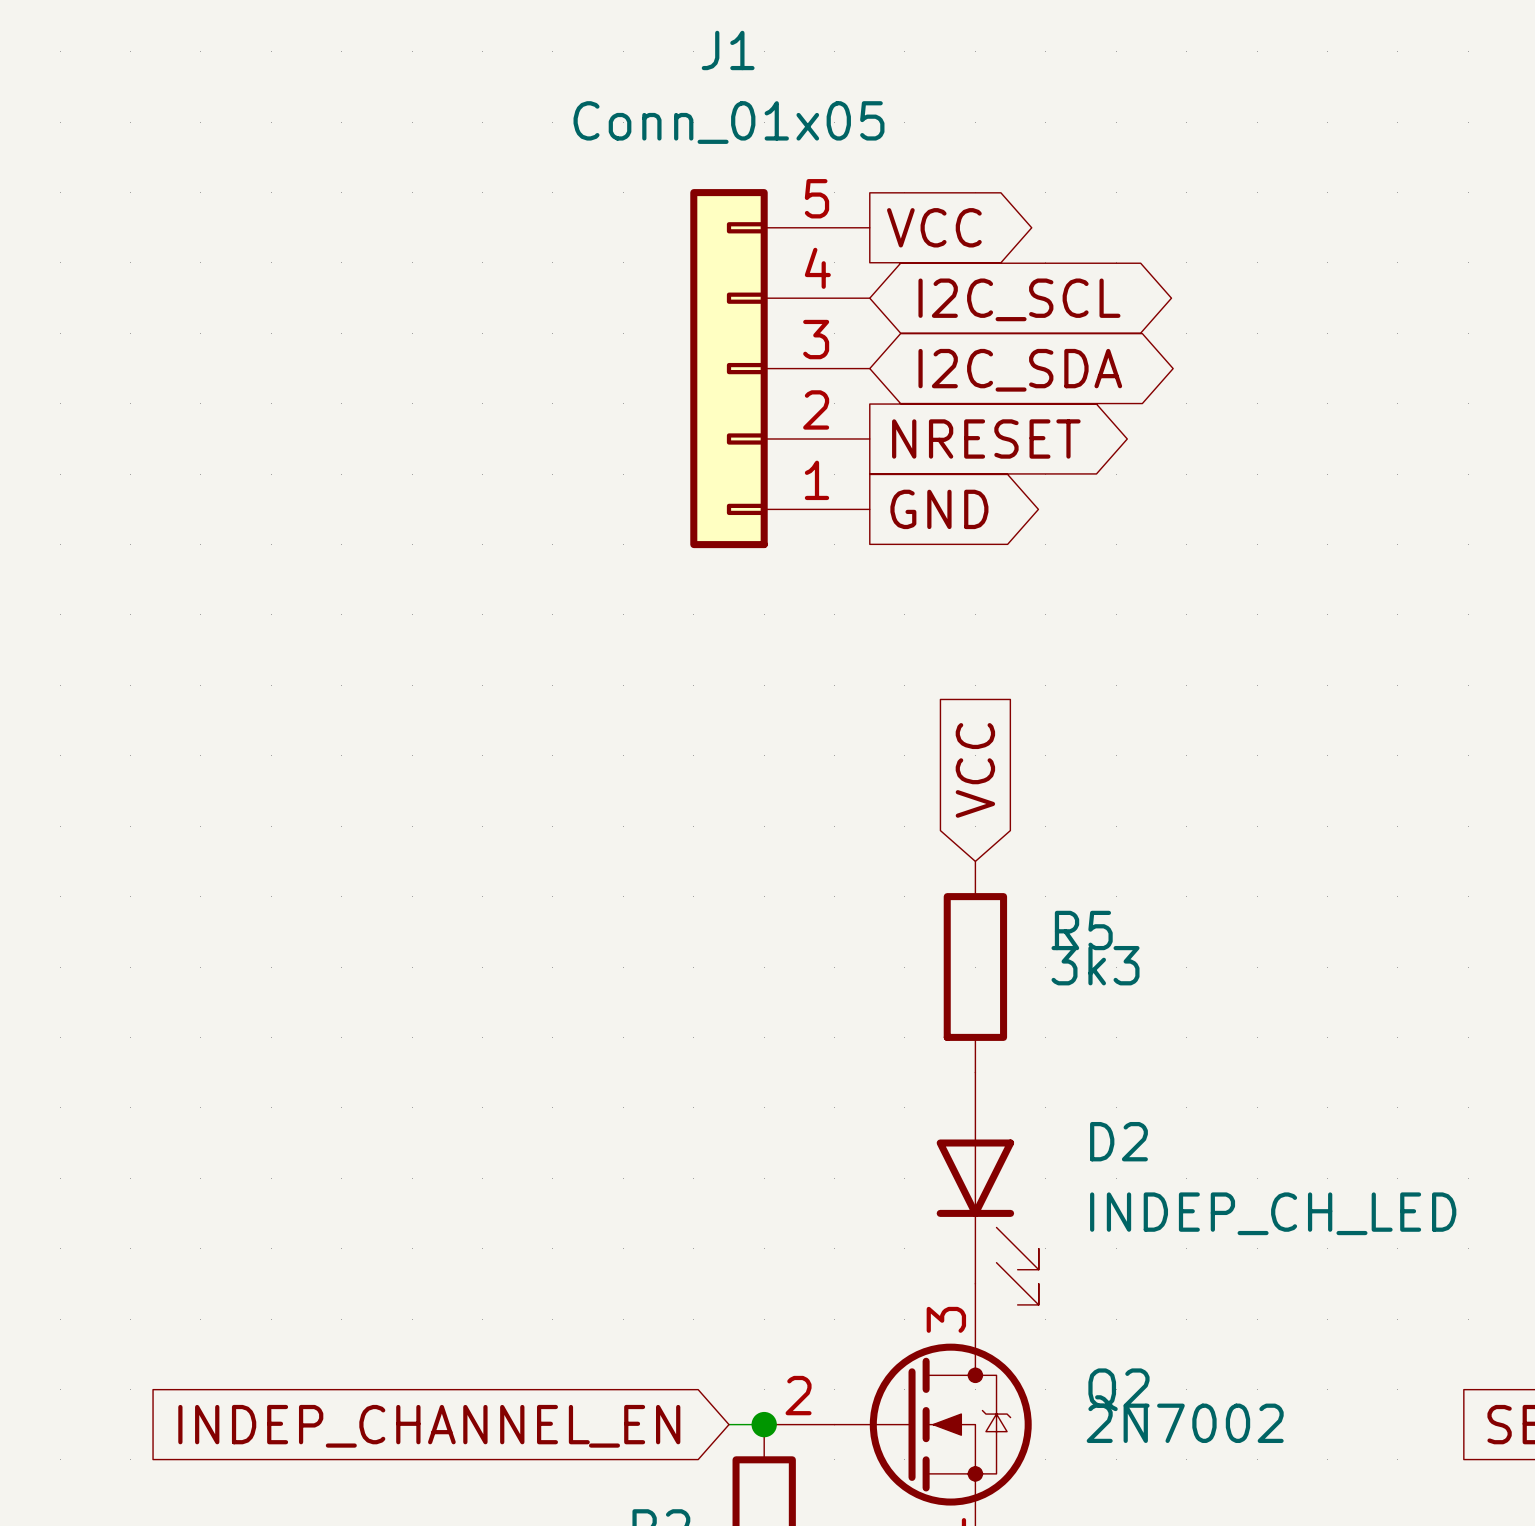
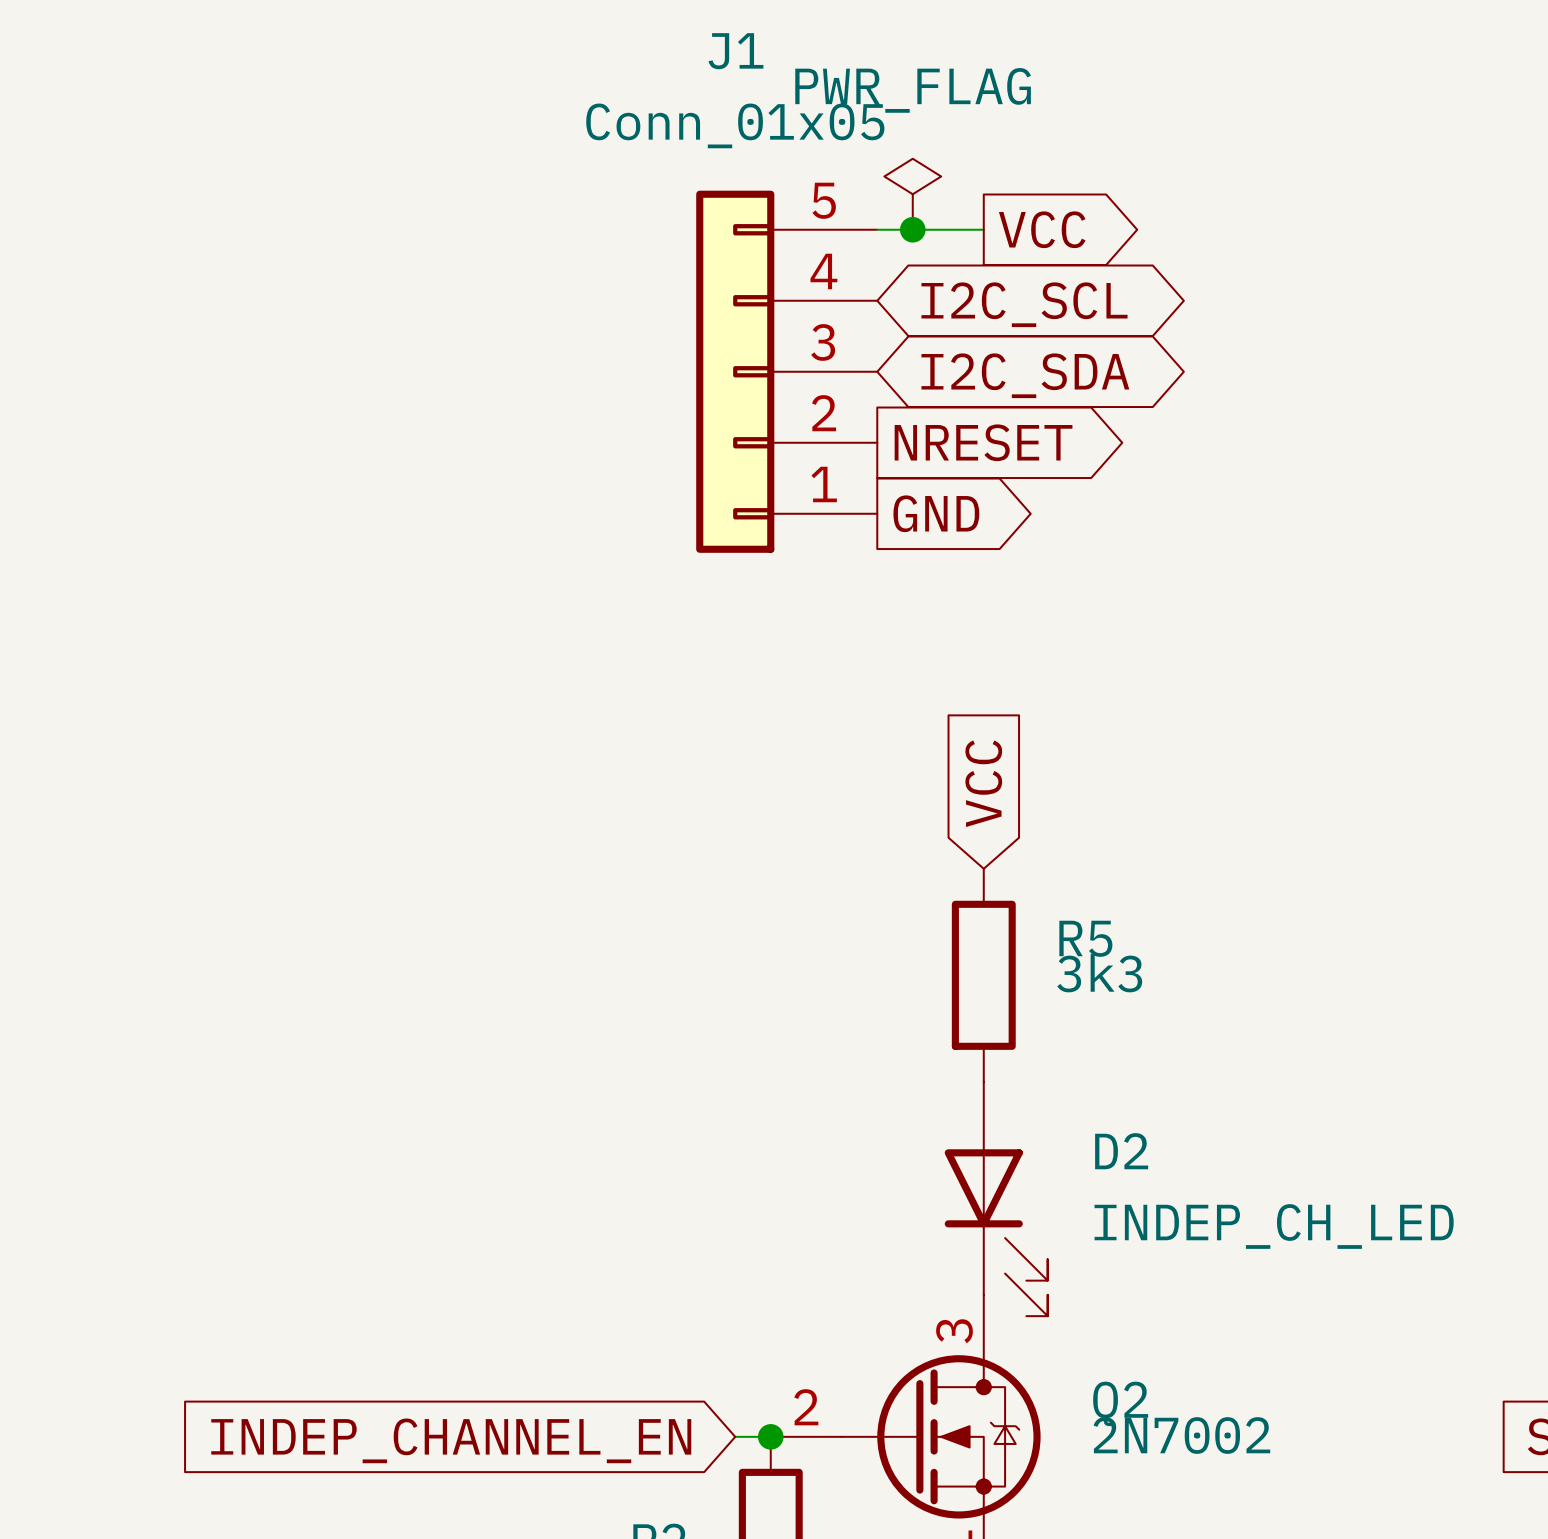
power symbol: none -> PWR_FLAG (912, 194)
wire: none -> (877, 229) (983, 229)
junction: none -> (912, 229)
global label position: VCC (934, 227) -> VCC (1042, 229)

